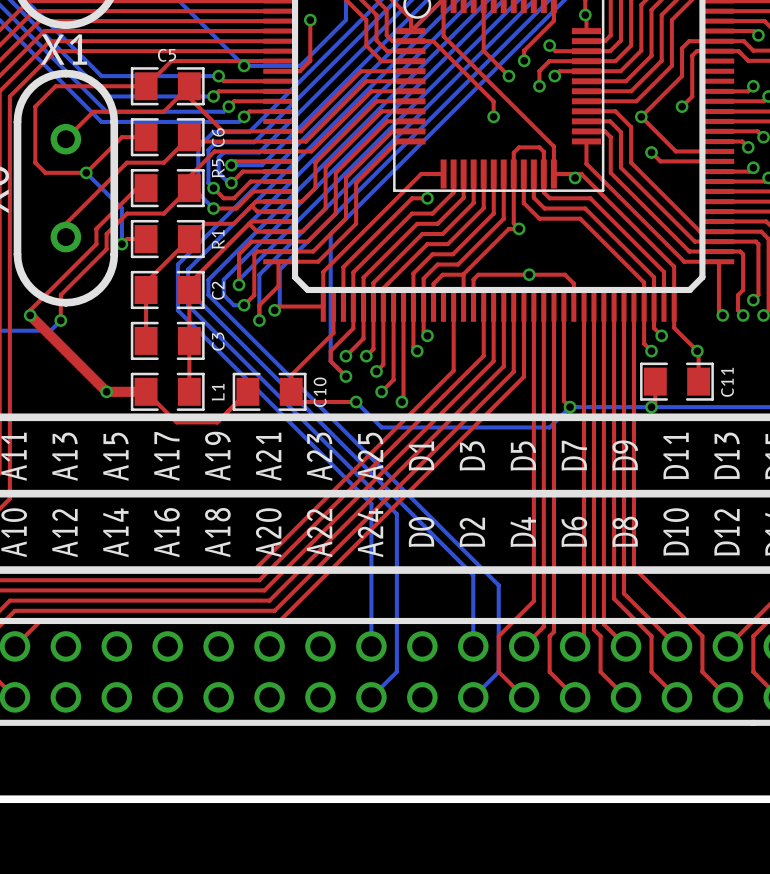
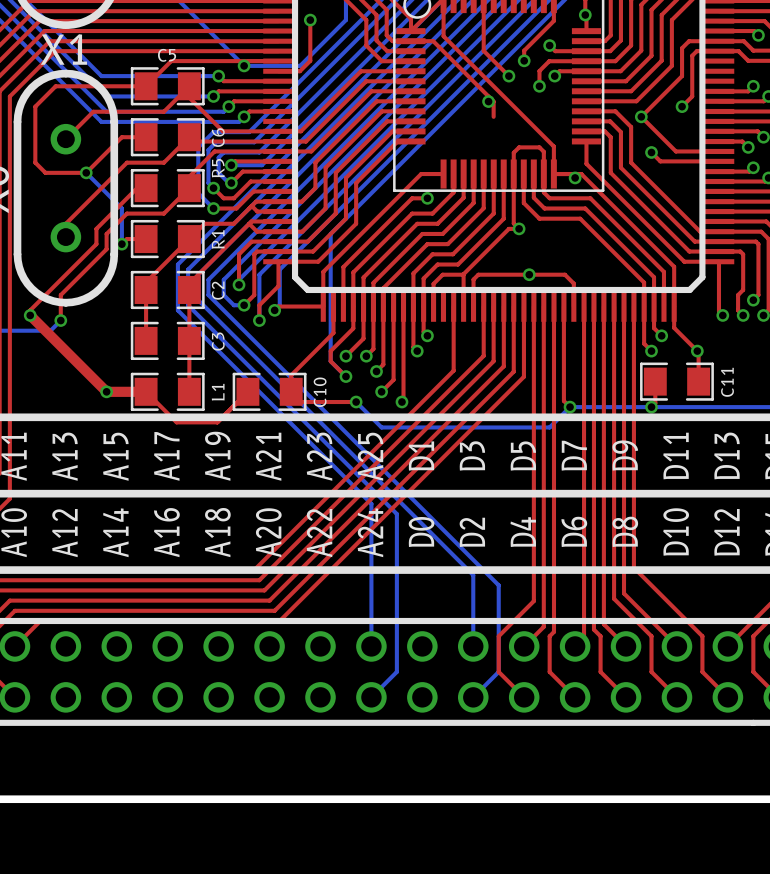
via position: (493, 116) -> (488, 101)

